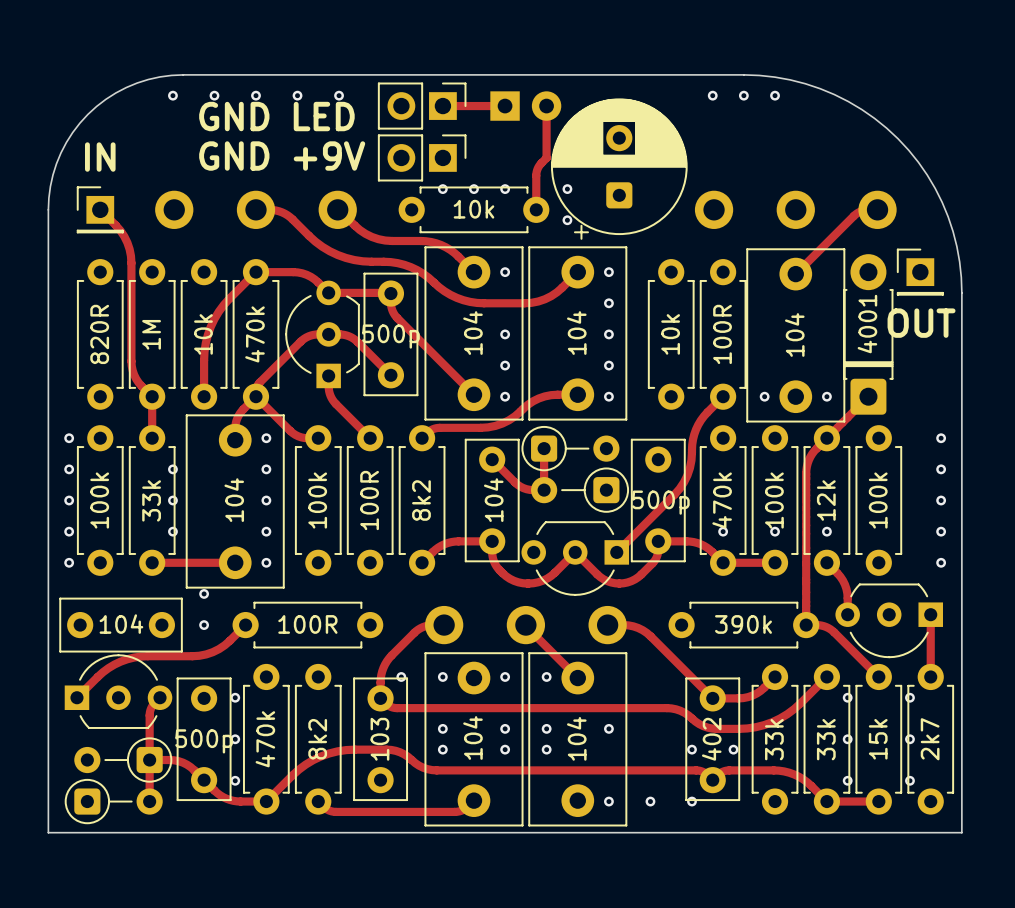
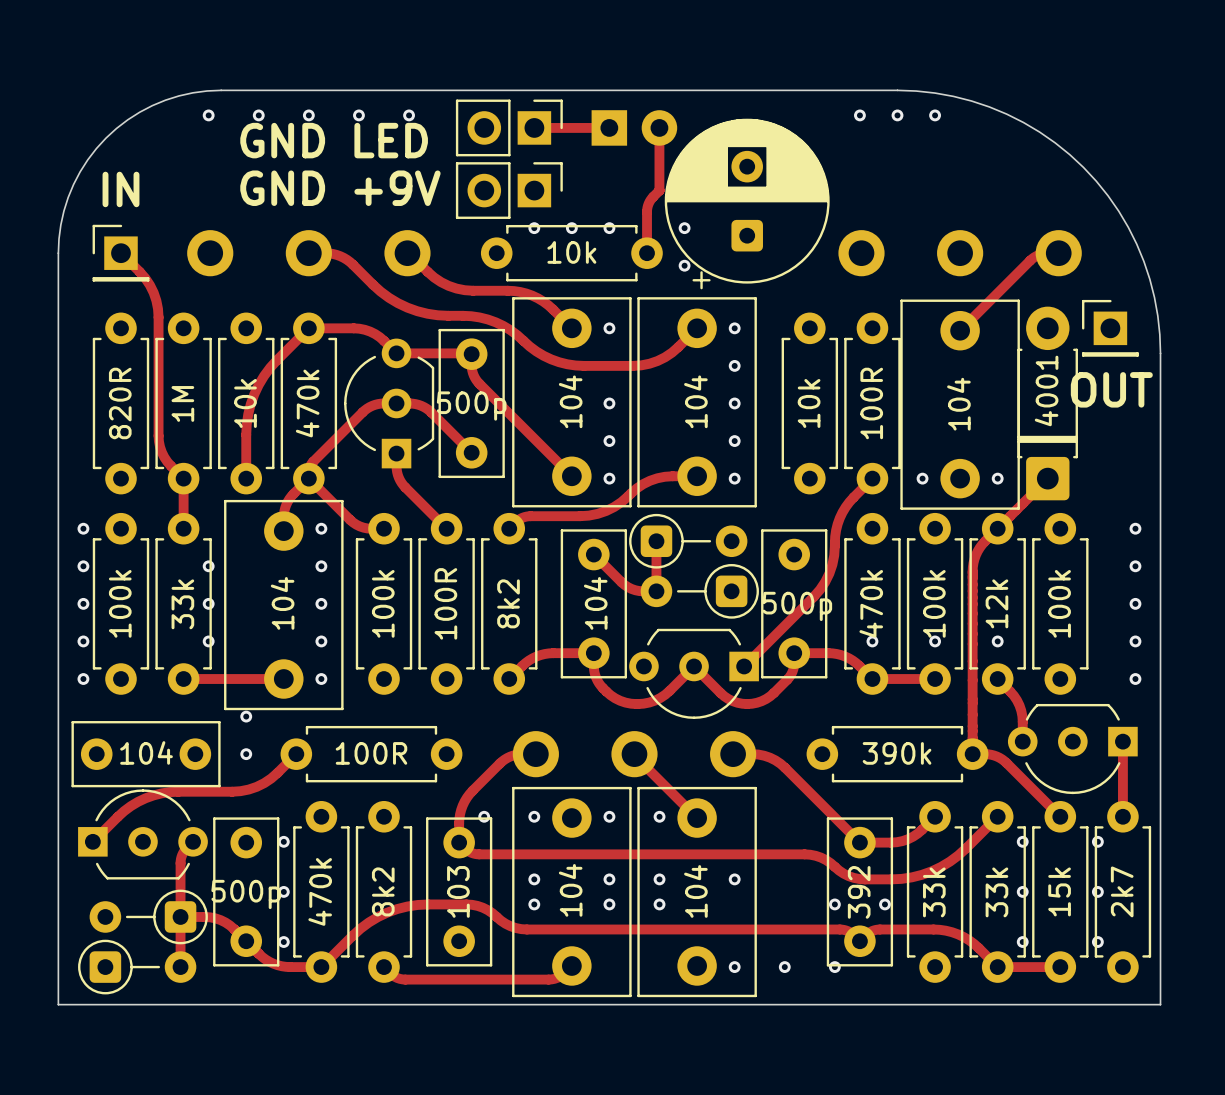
part value: 402 (711, 739) -> 392 (859, 892)

